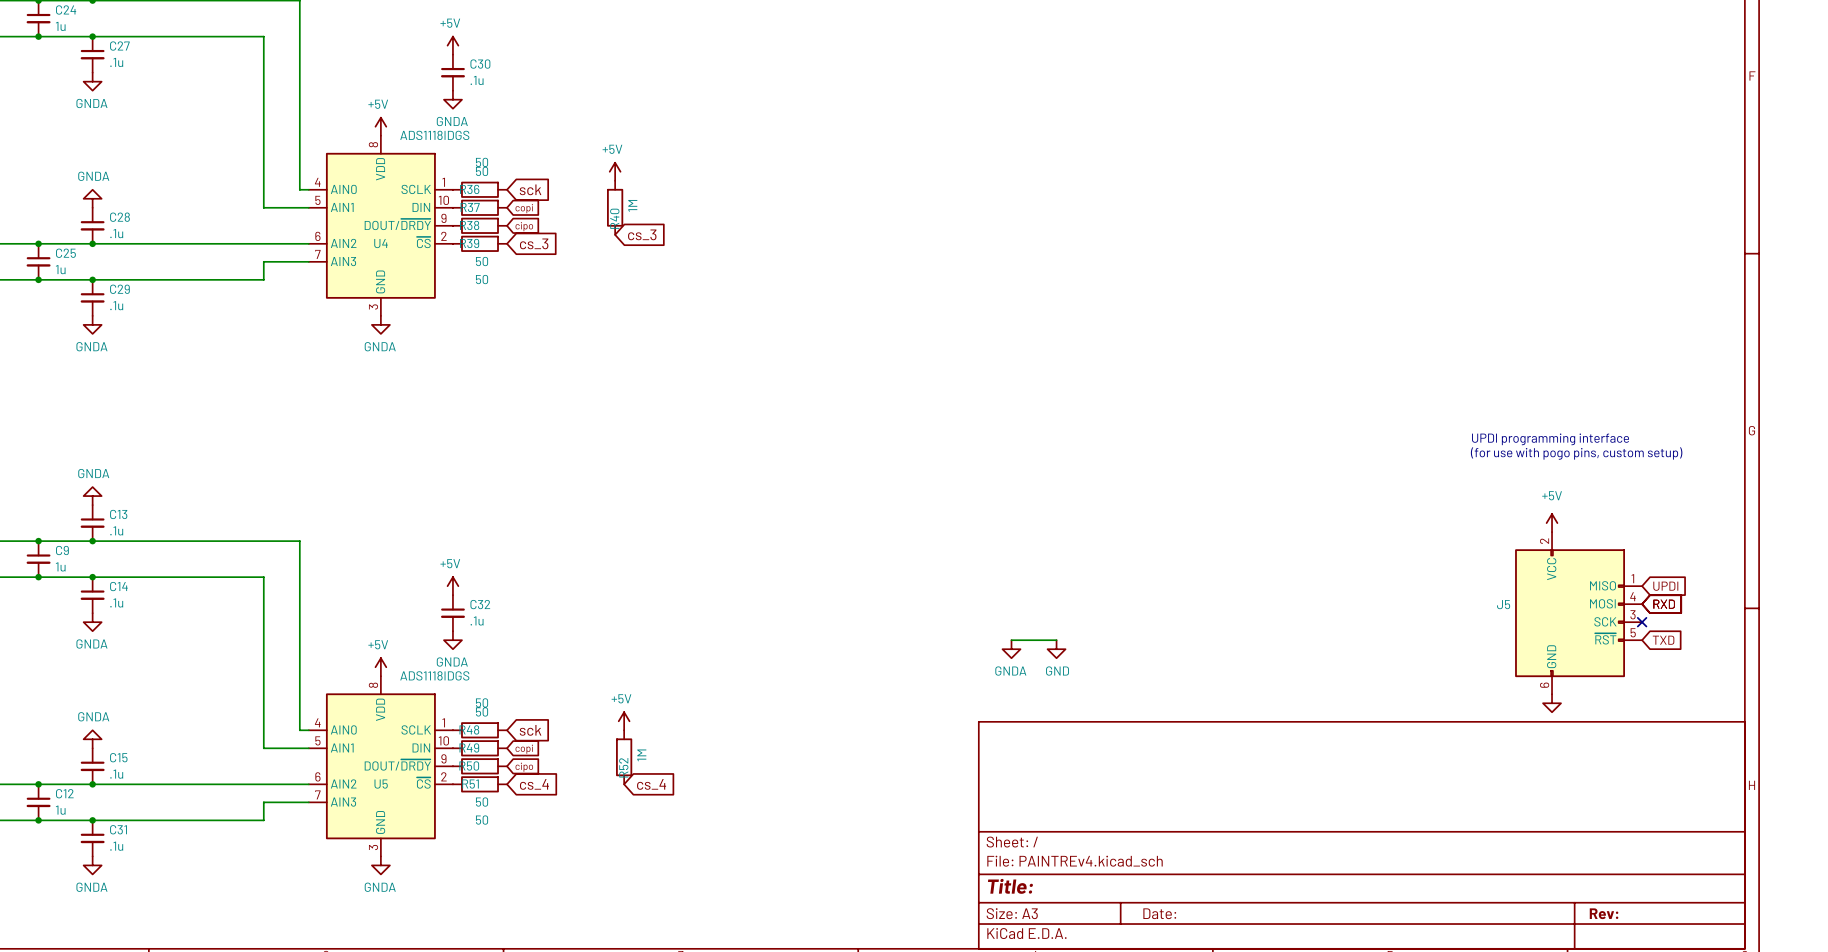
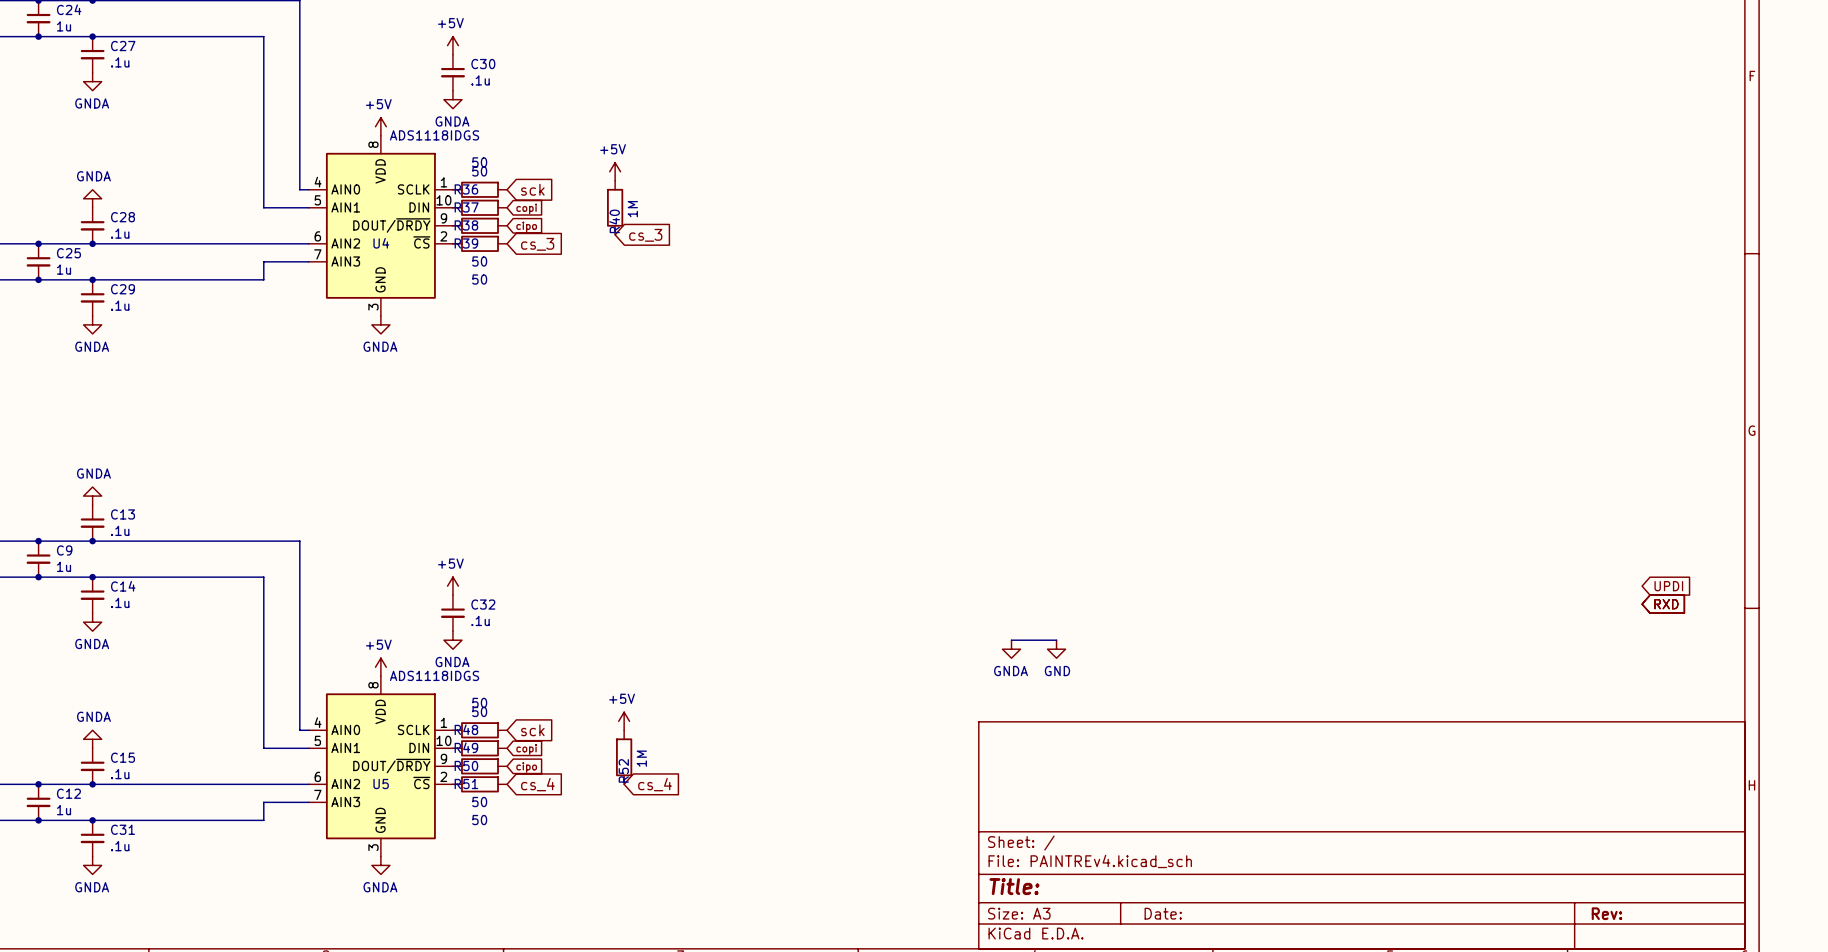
text: UPDI programming interface (1550, 439) -> none
text: (for use with pogo pins, custom setup) (1576, 453) -> none
power symbol: +5V (1552, 523) -> none
J5: (1578, 613) -> none
no-connect mark: (1642, 622) -> none
global label: TXD (1663, 640) -> none
power symbol: (1552, 703) -> none

